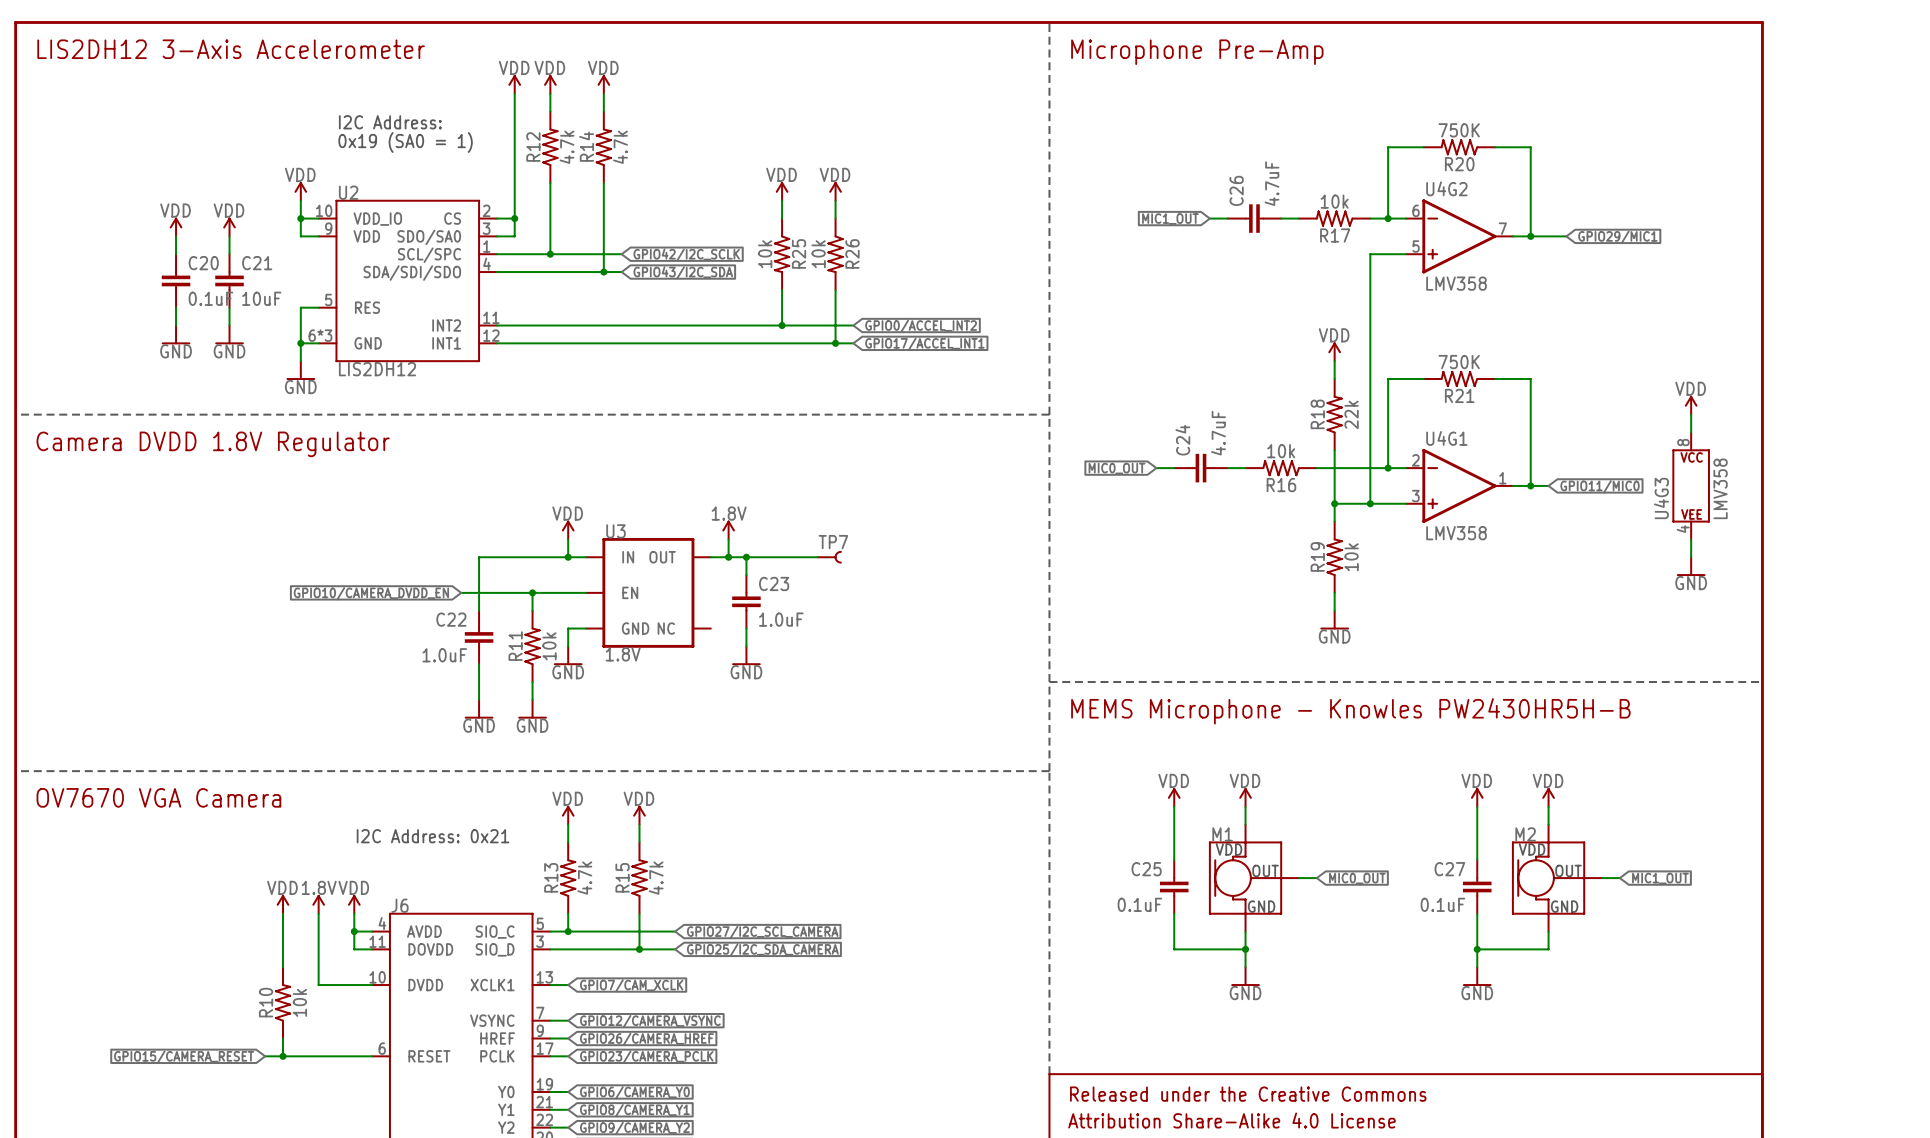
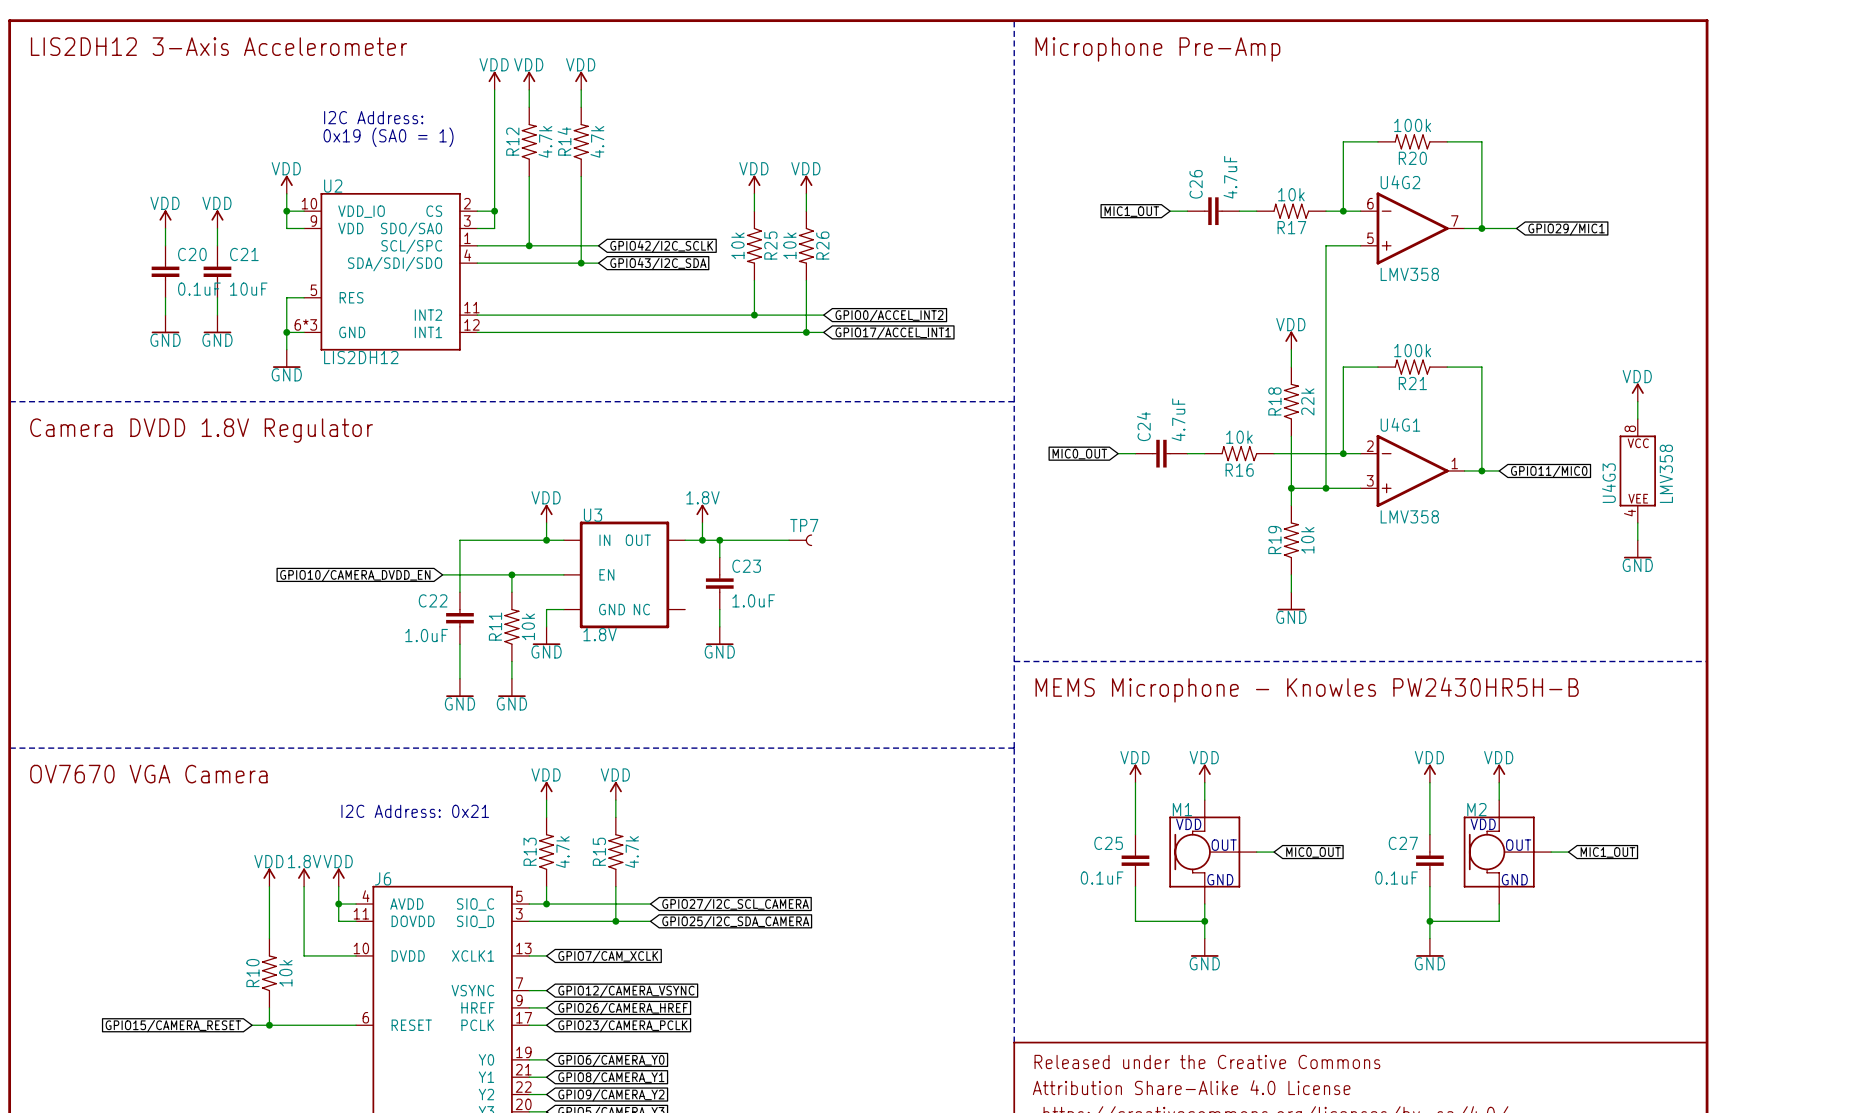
R20 value: 750K (1459, 130) -> 100k (1412, 125)
R21 value: 750K (1459, 362) -> 100k (1412, 350)

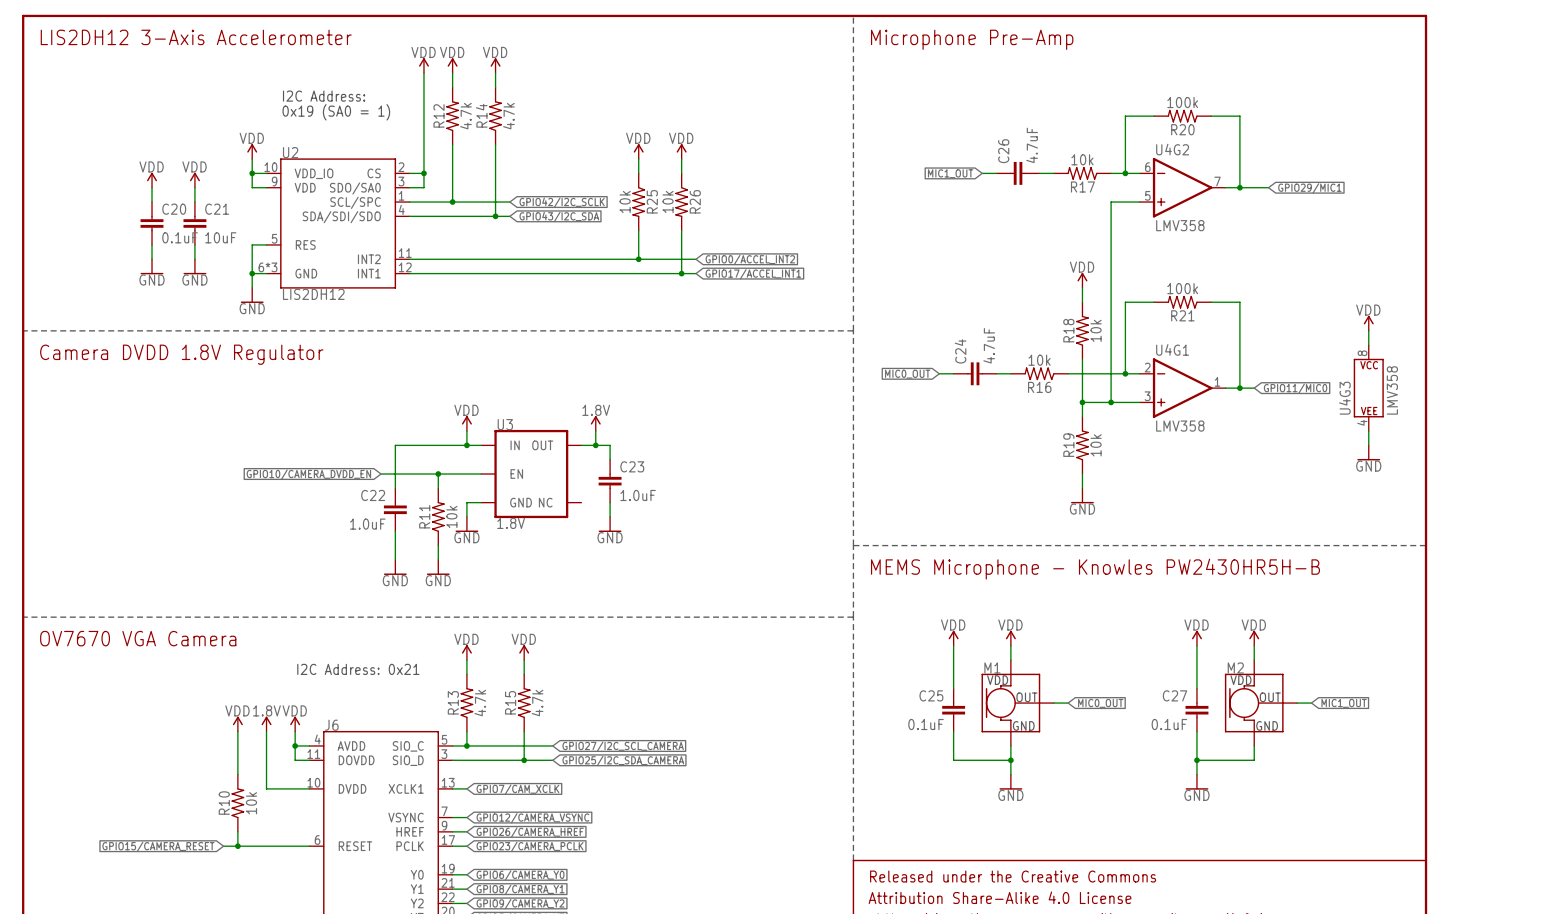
R18 value: 22k (1307, 401) -> 10k (1096, 330)
wire: (719, 540) (789, 540) -> none
junction: (719, 540) -> none
TP7: (800, 540) -> none

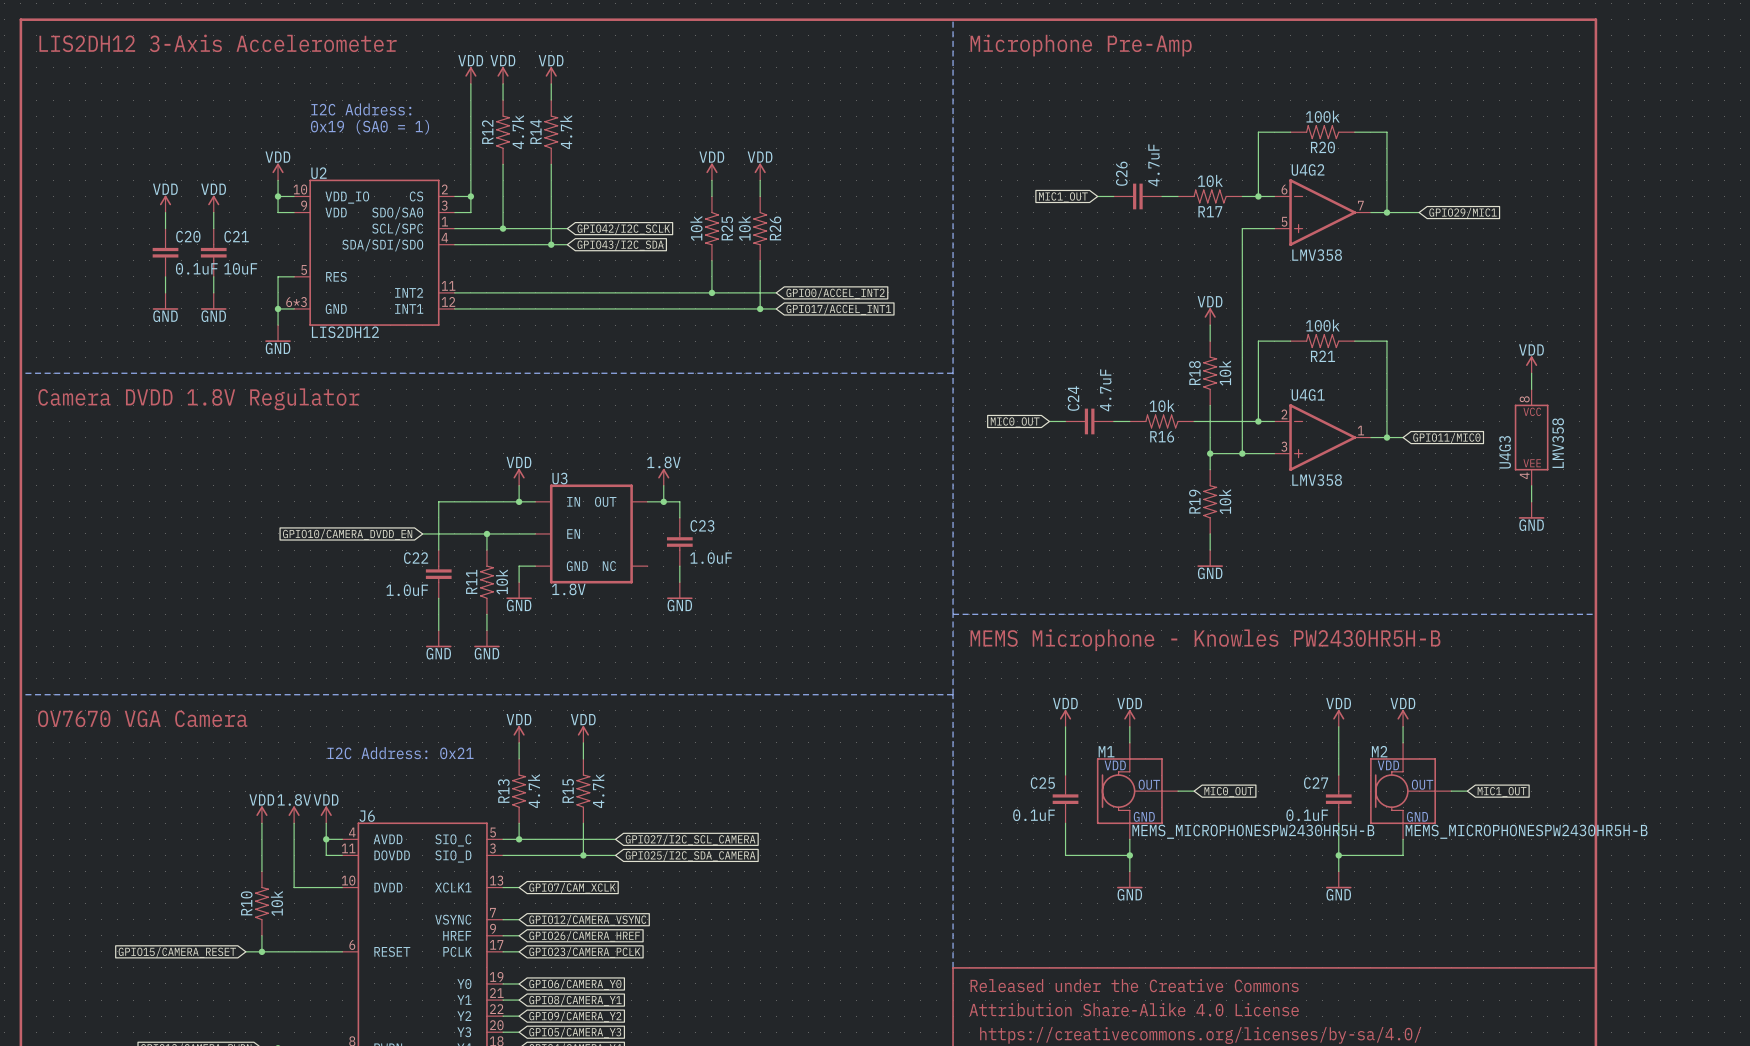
M1 value: none -> MEMS_MICROPHONESPW2430HR5H-B (1253, 831)
M2 value: none -> MEMS_MICROPHONESPW2430HR5H-B (1526, 831)

